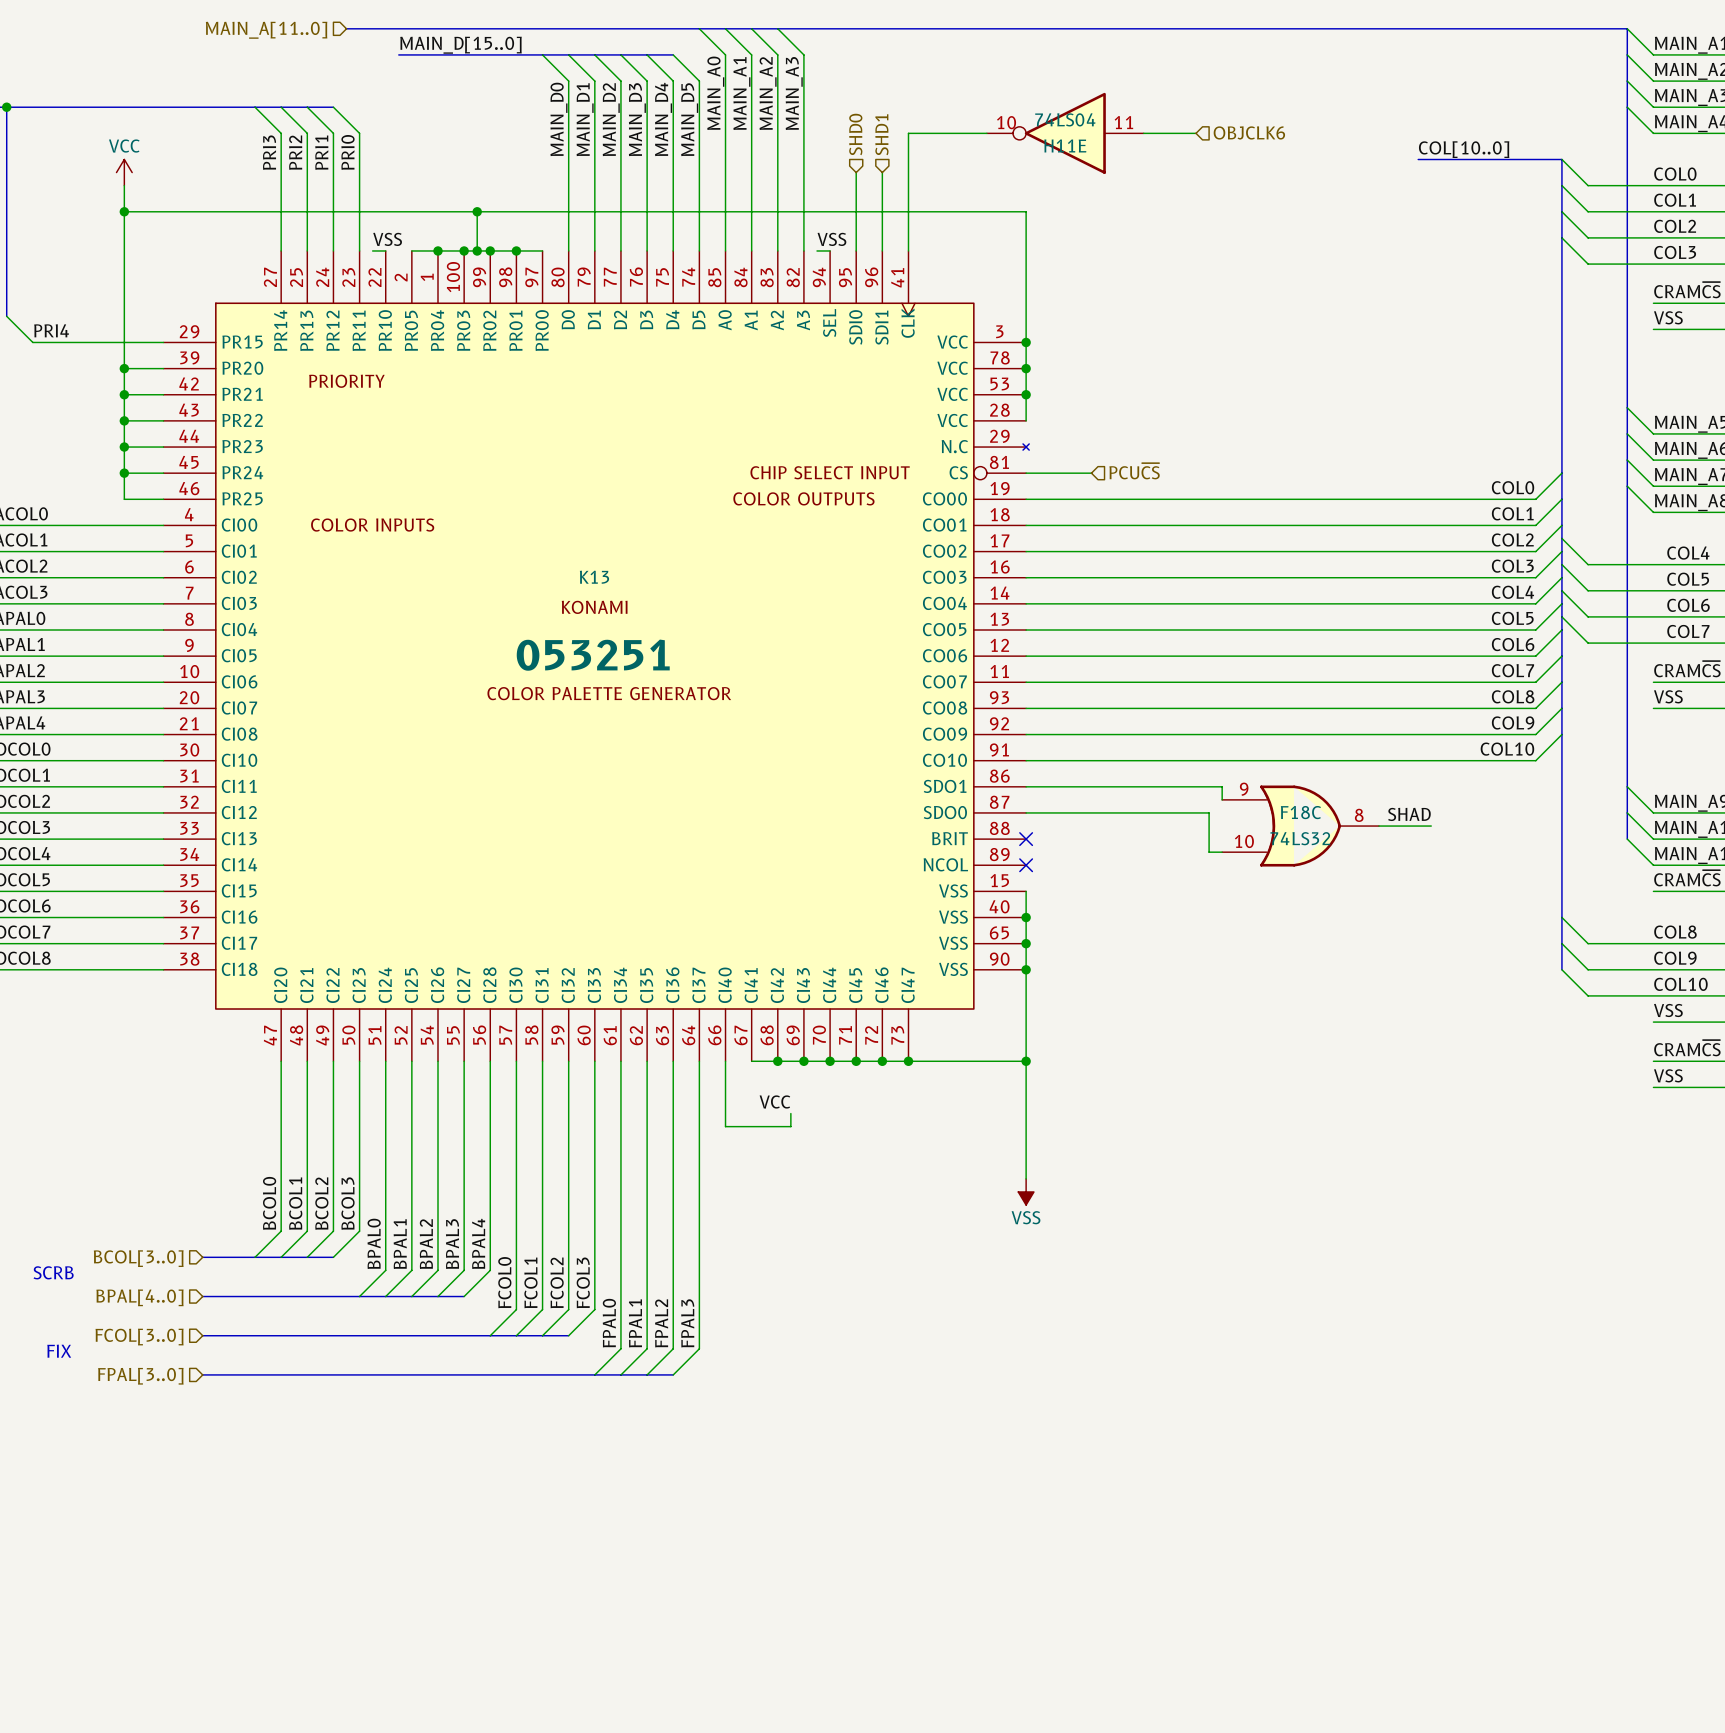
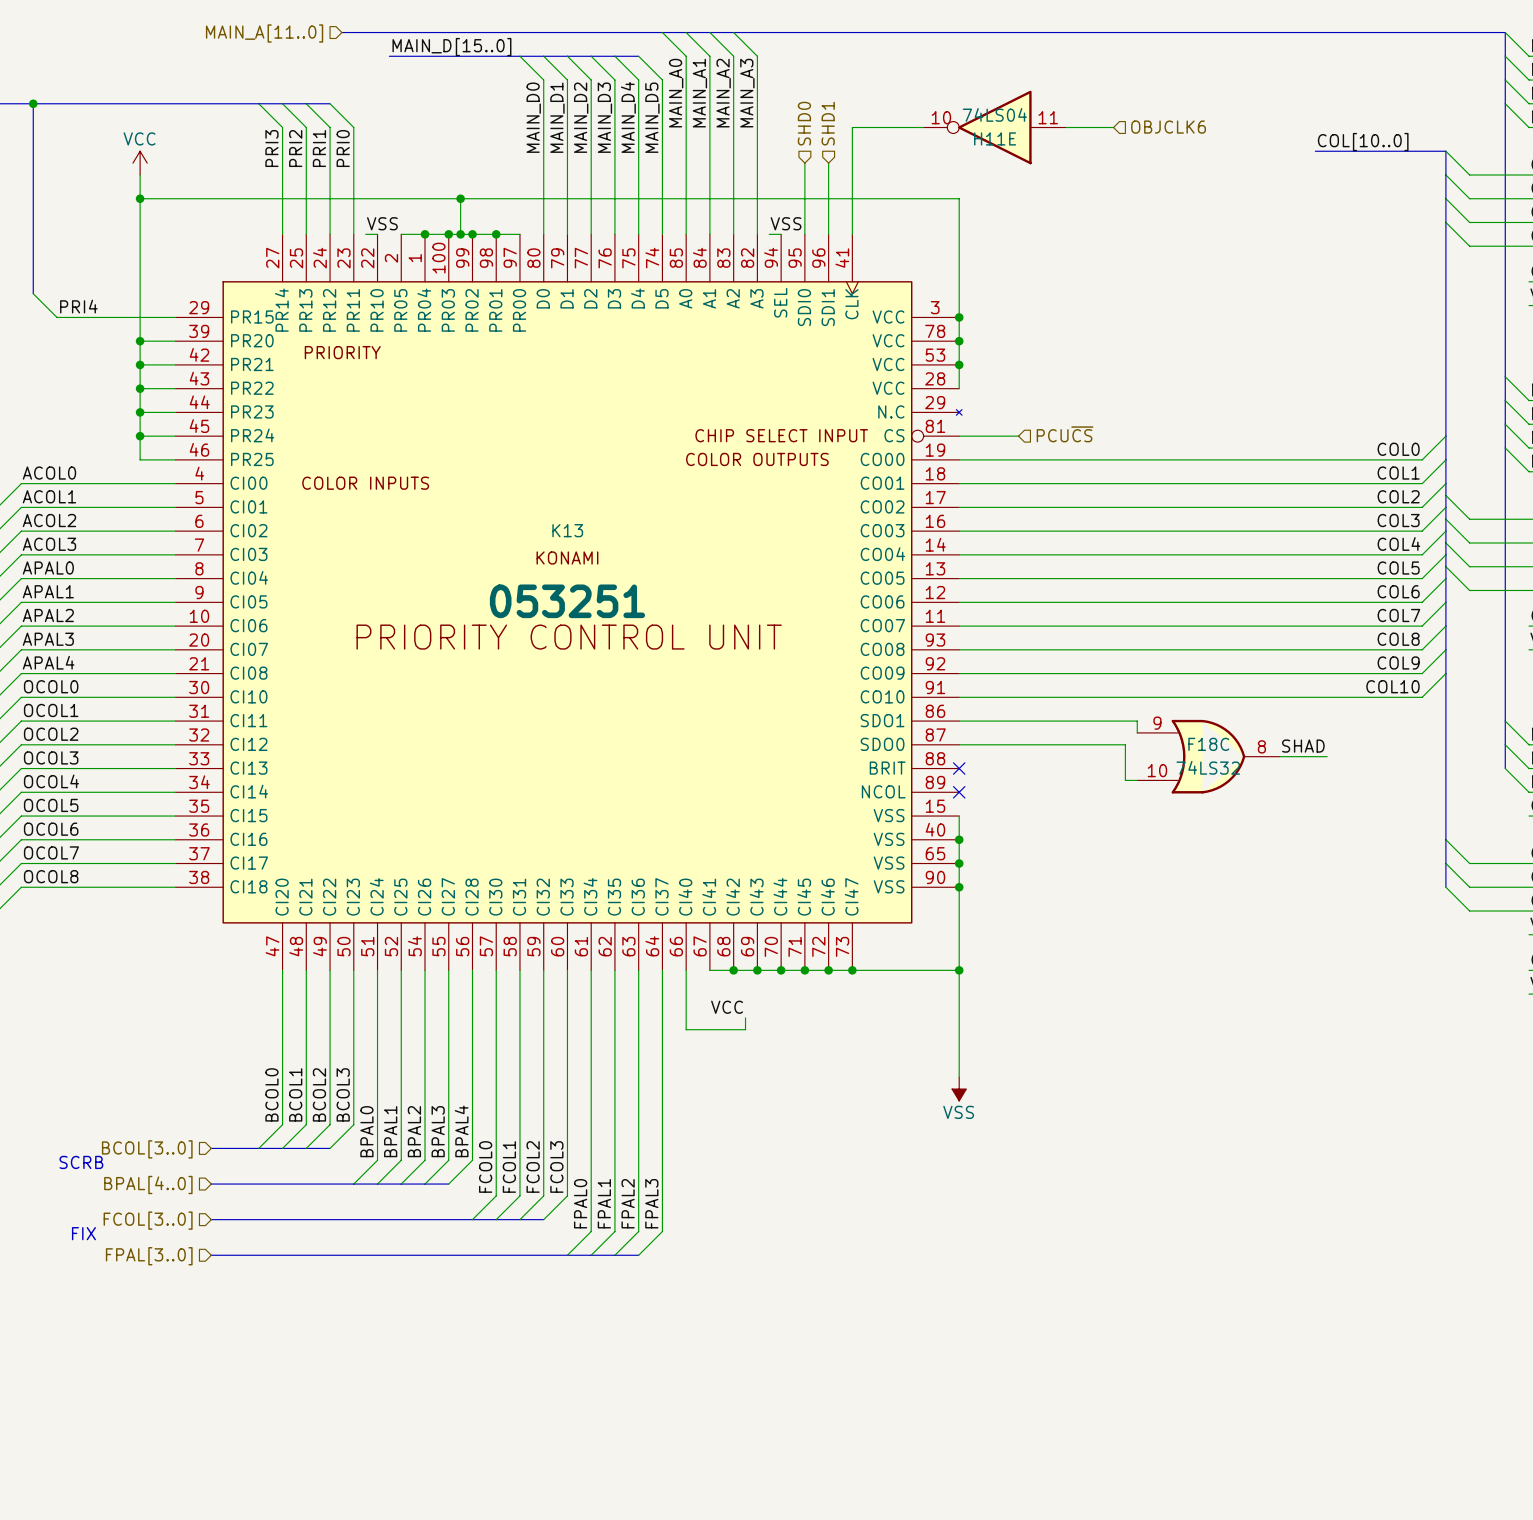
K13 text: COLOR PALETTE GENERATOR (609, 693) -> none
K13 text: none -> PRIORITY CONTROL UNIT (569, 637)

